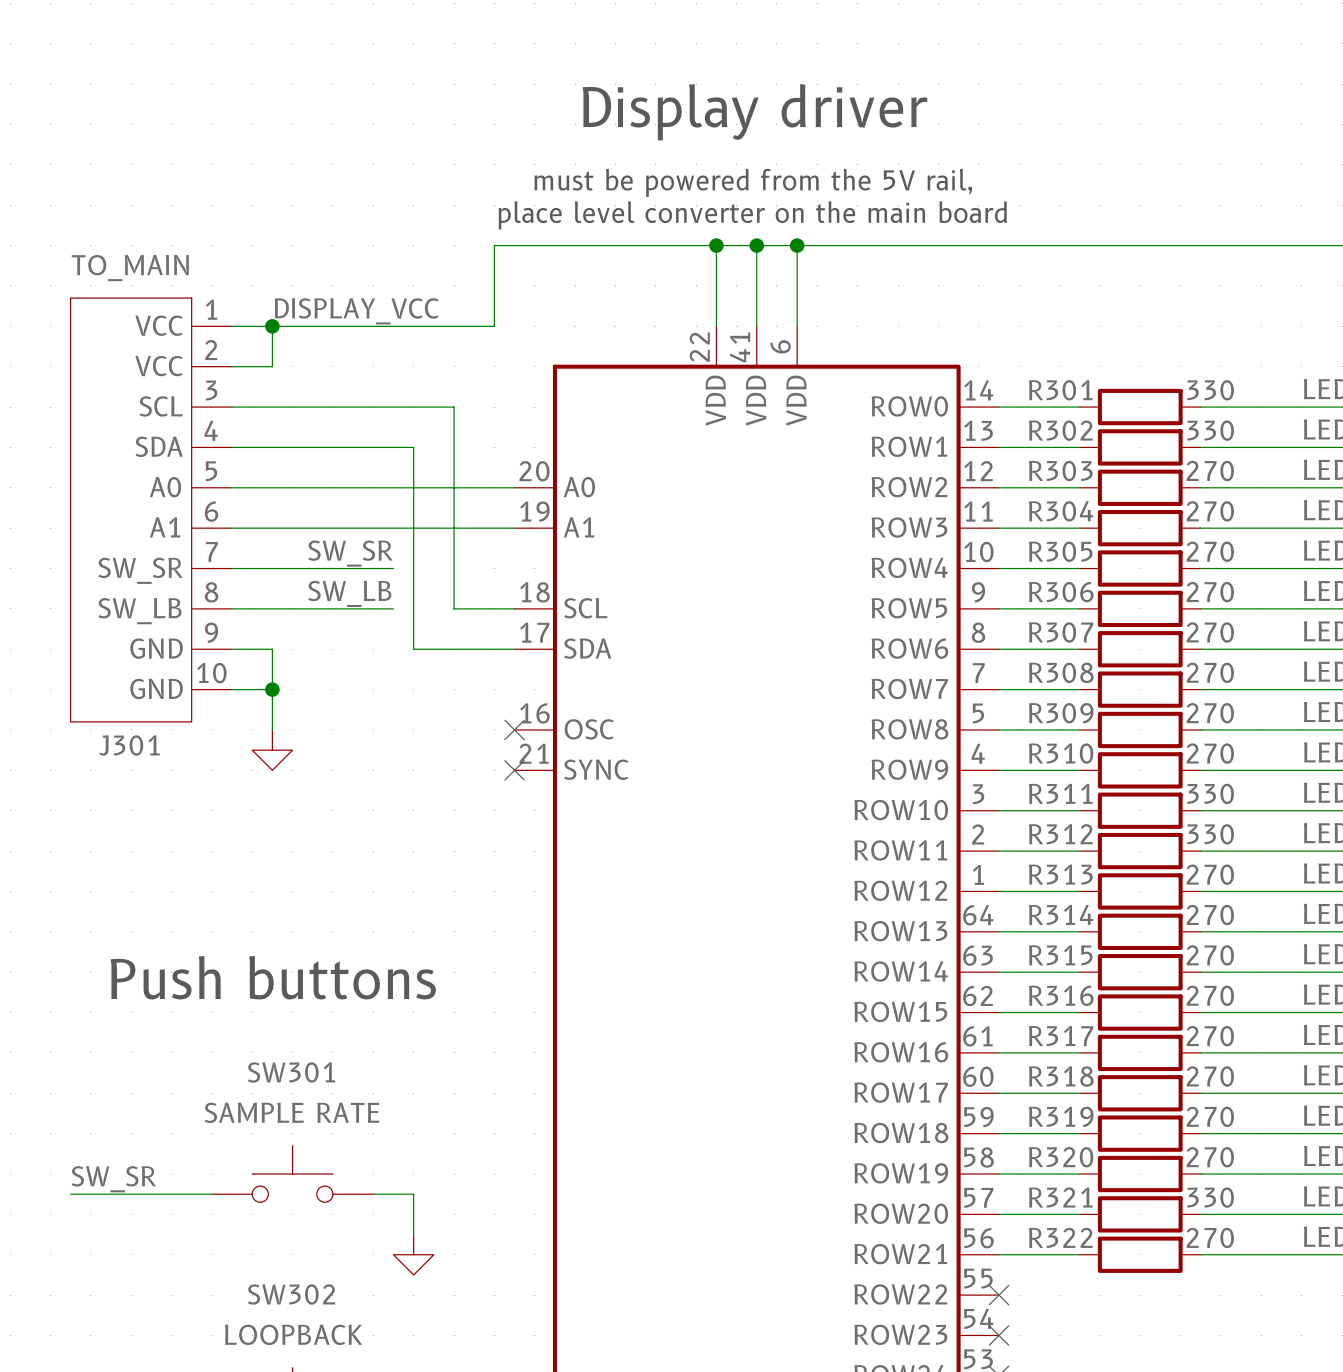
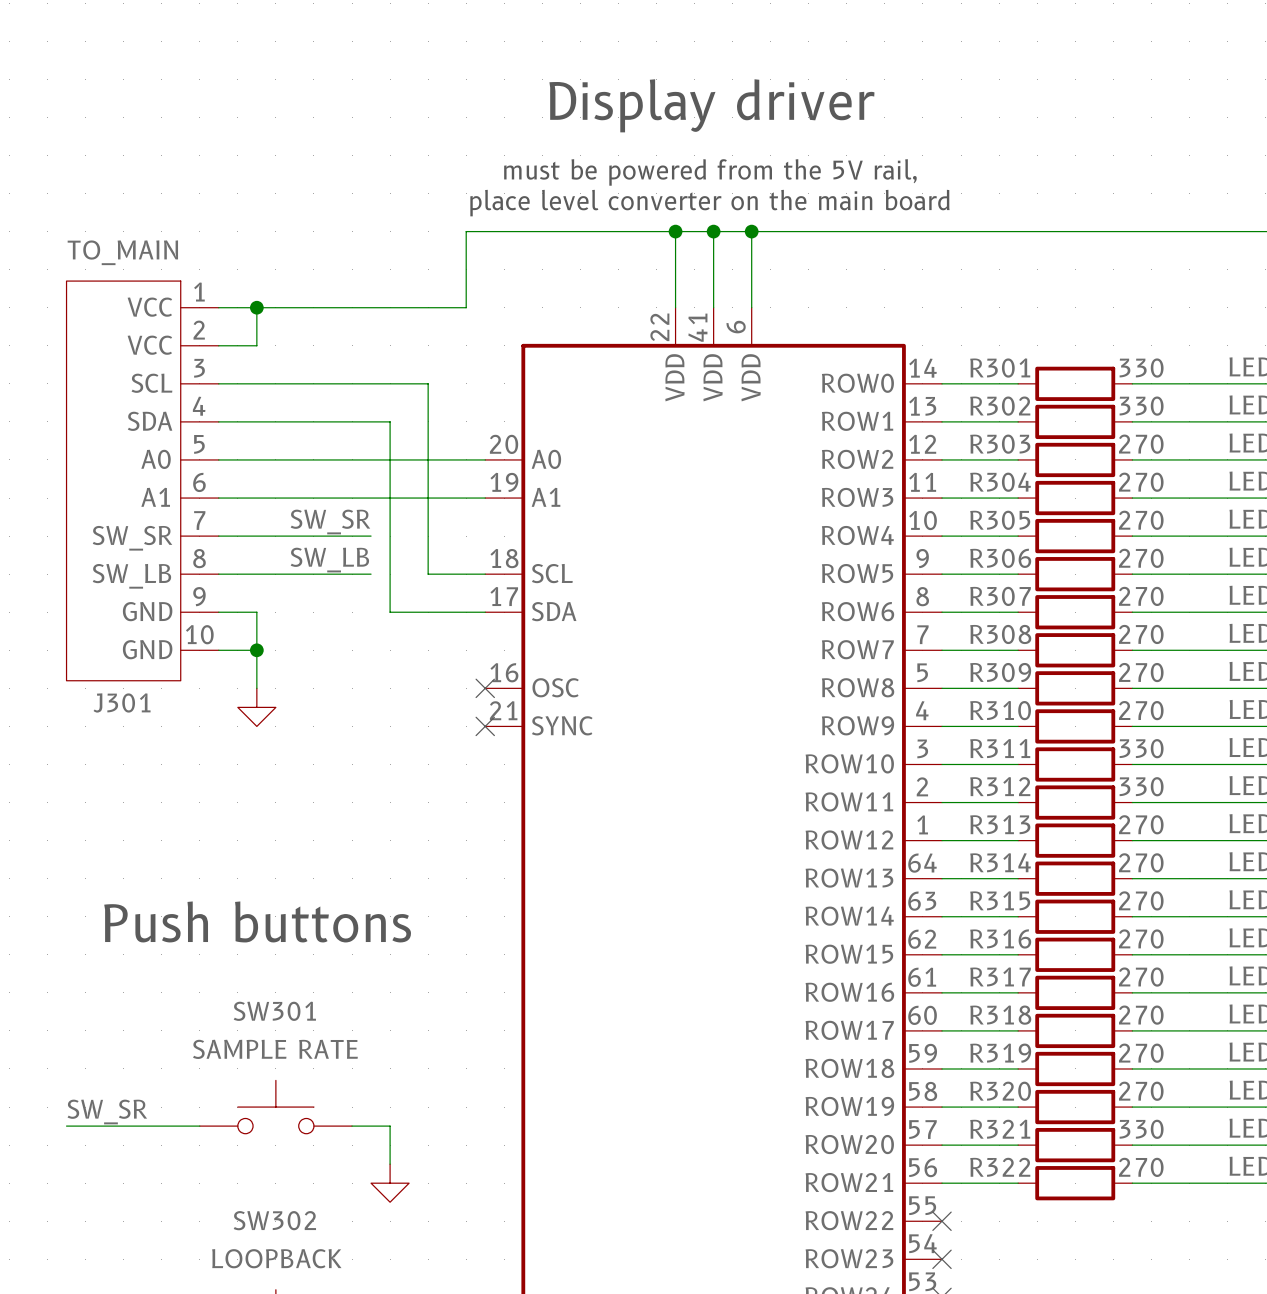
label: DISPLAY_VCC (356, 311) -> none

